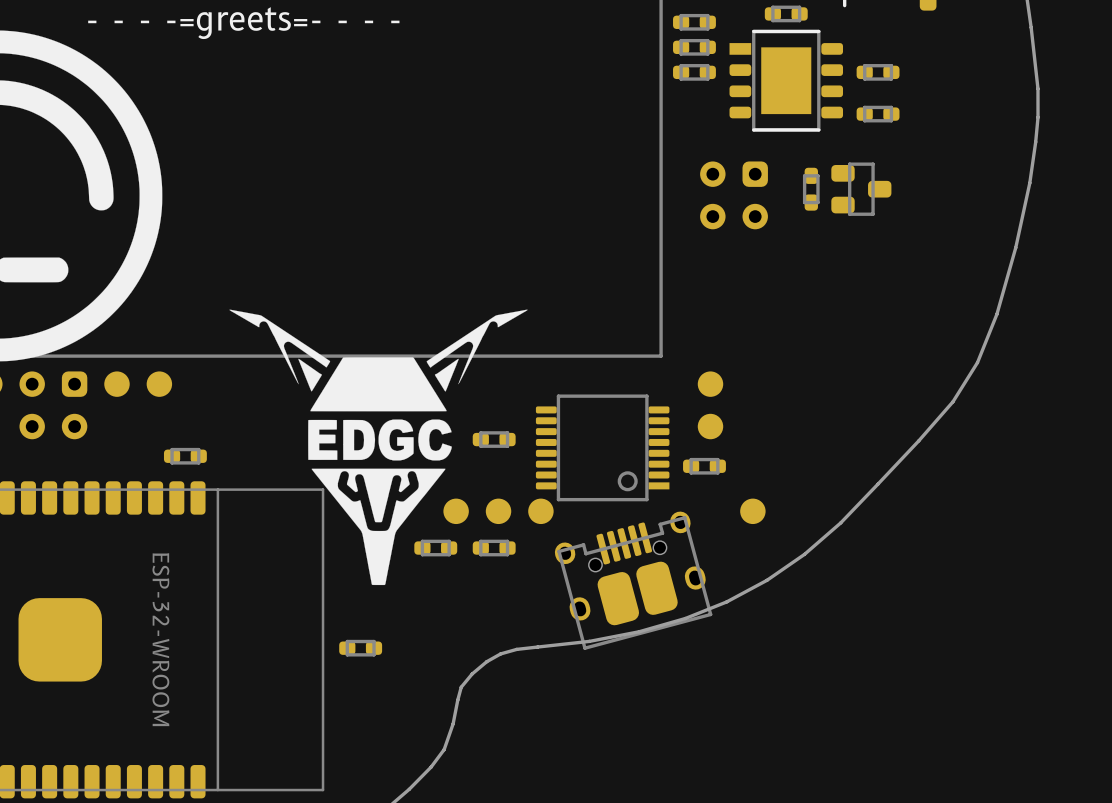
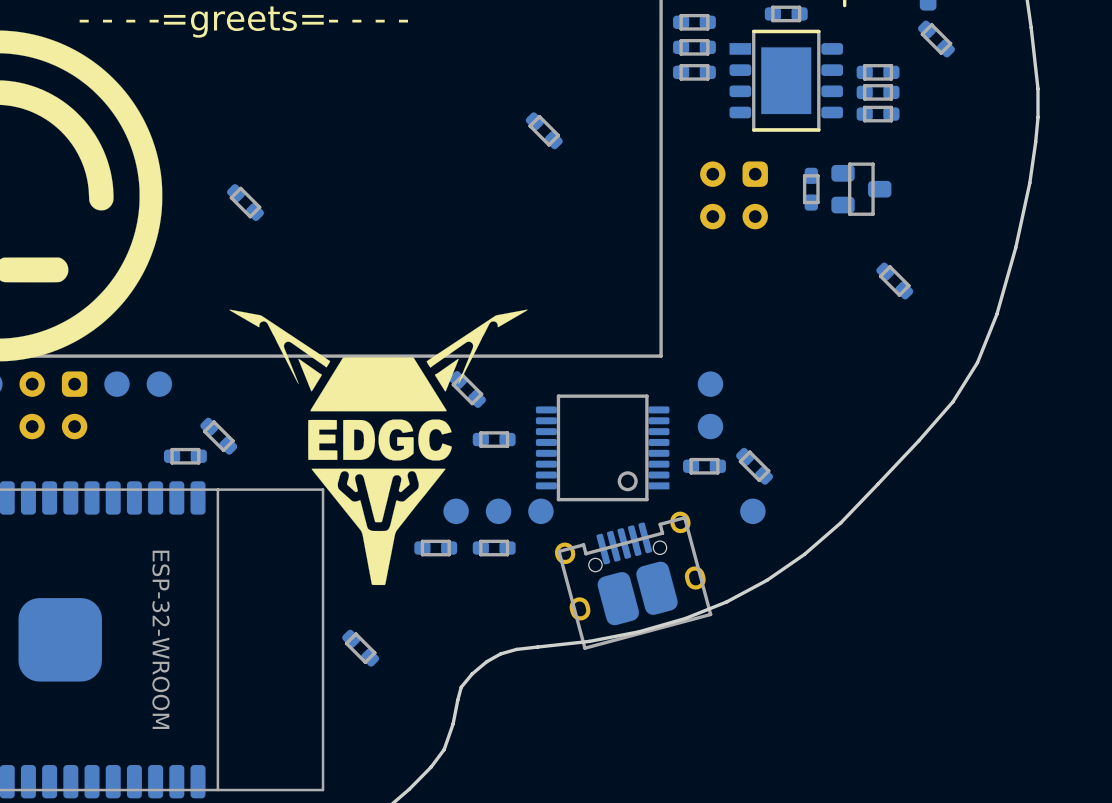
part: none -> (936, 38)
part: none -> (878, 92)
part: none -> (544, 130)
part: none -> (245, 202)
part: none -> (894, 280)
part: none -> (467, 389)
part: none -> (218, 436)
part: none -> (754, 466)
part rotation: 0° (360, 648) -> 45° clockwise (360, 648)

